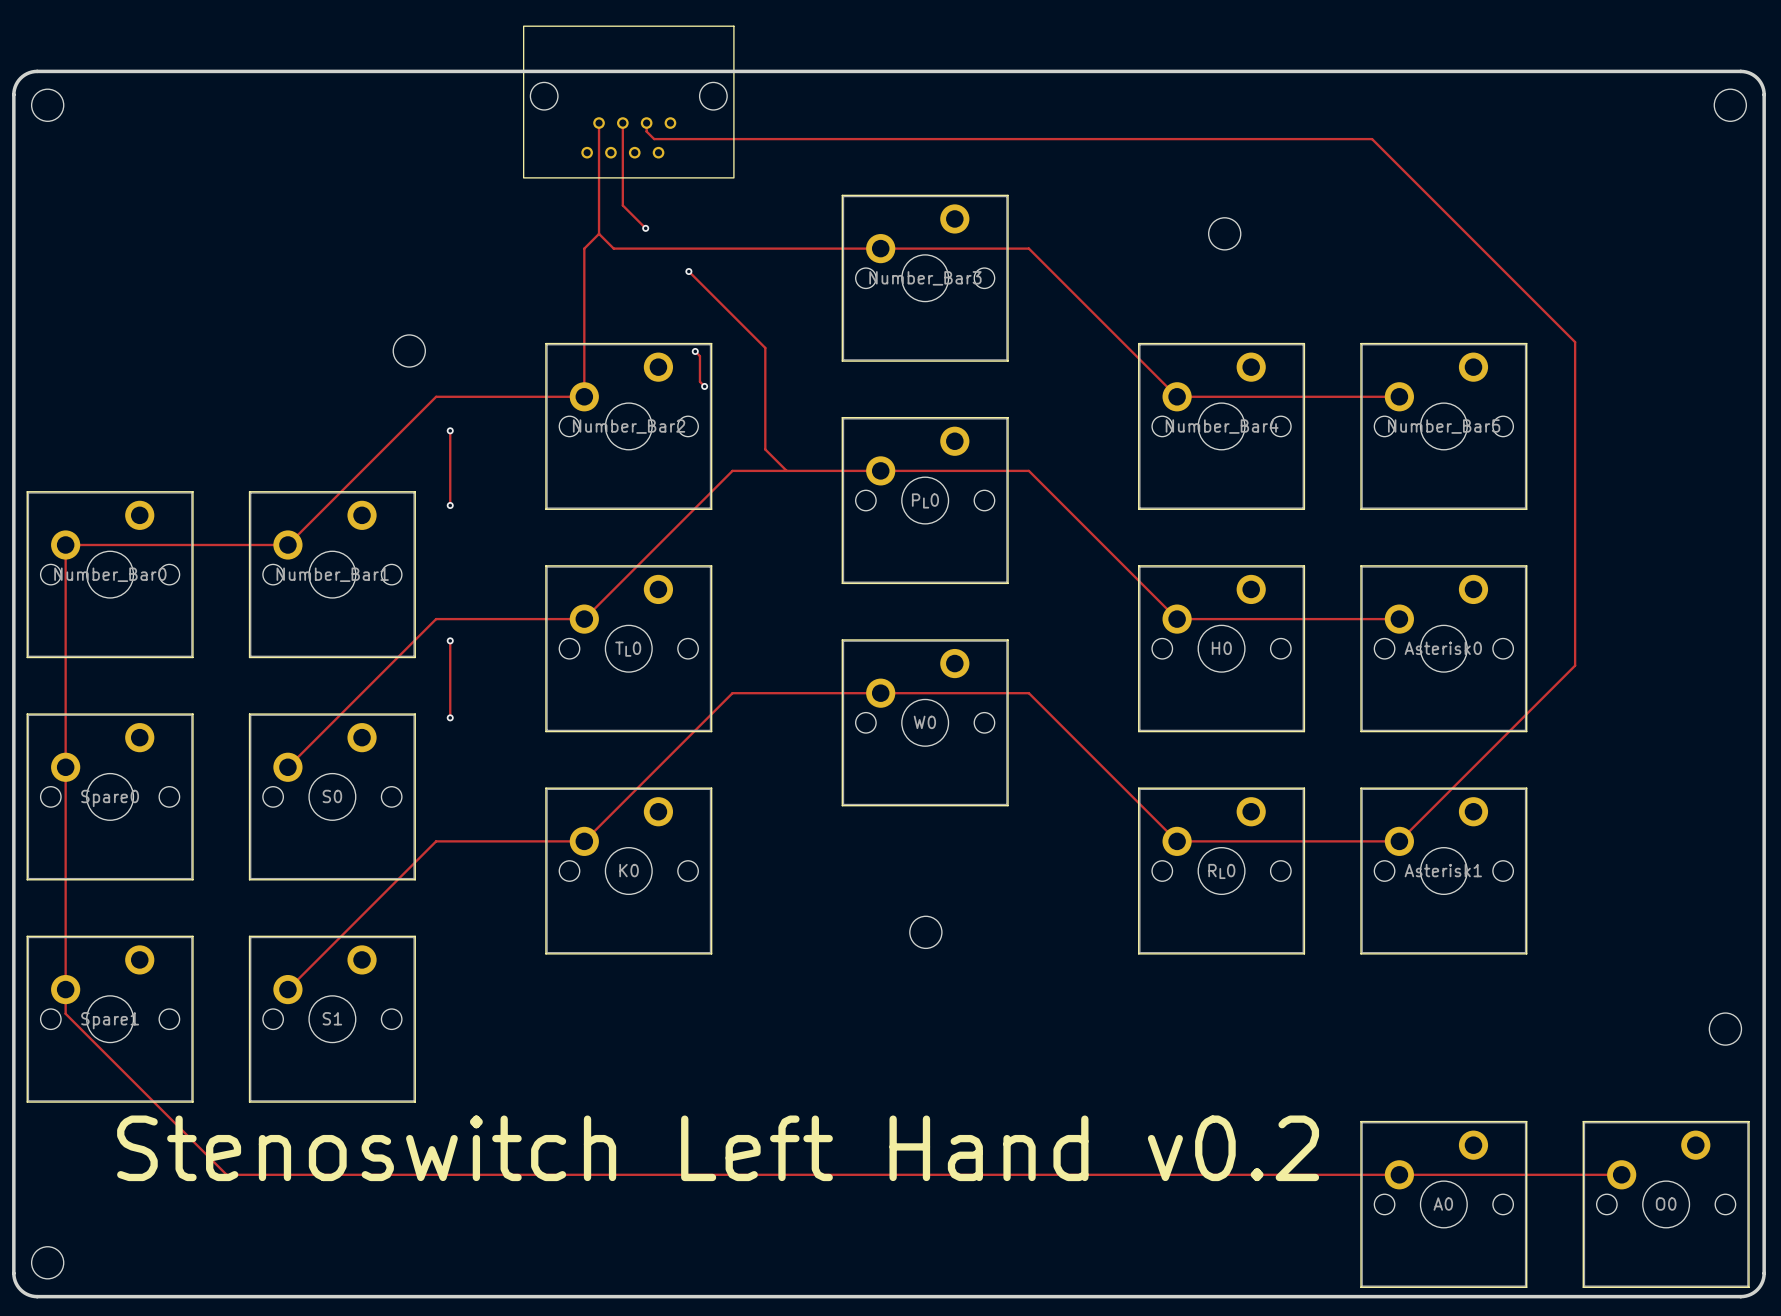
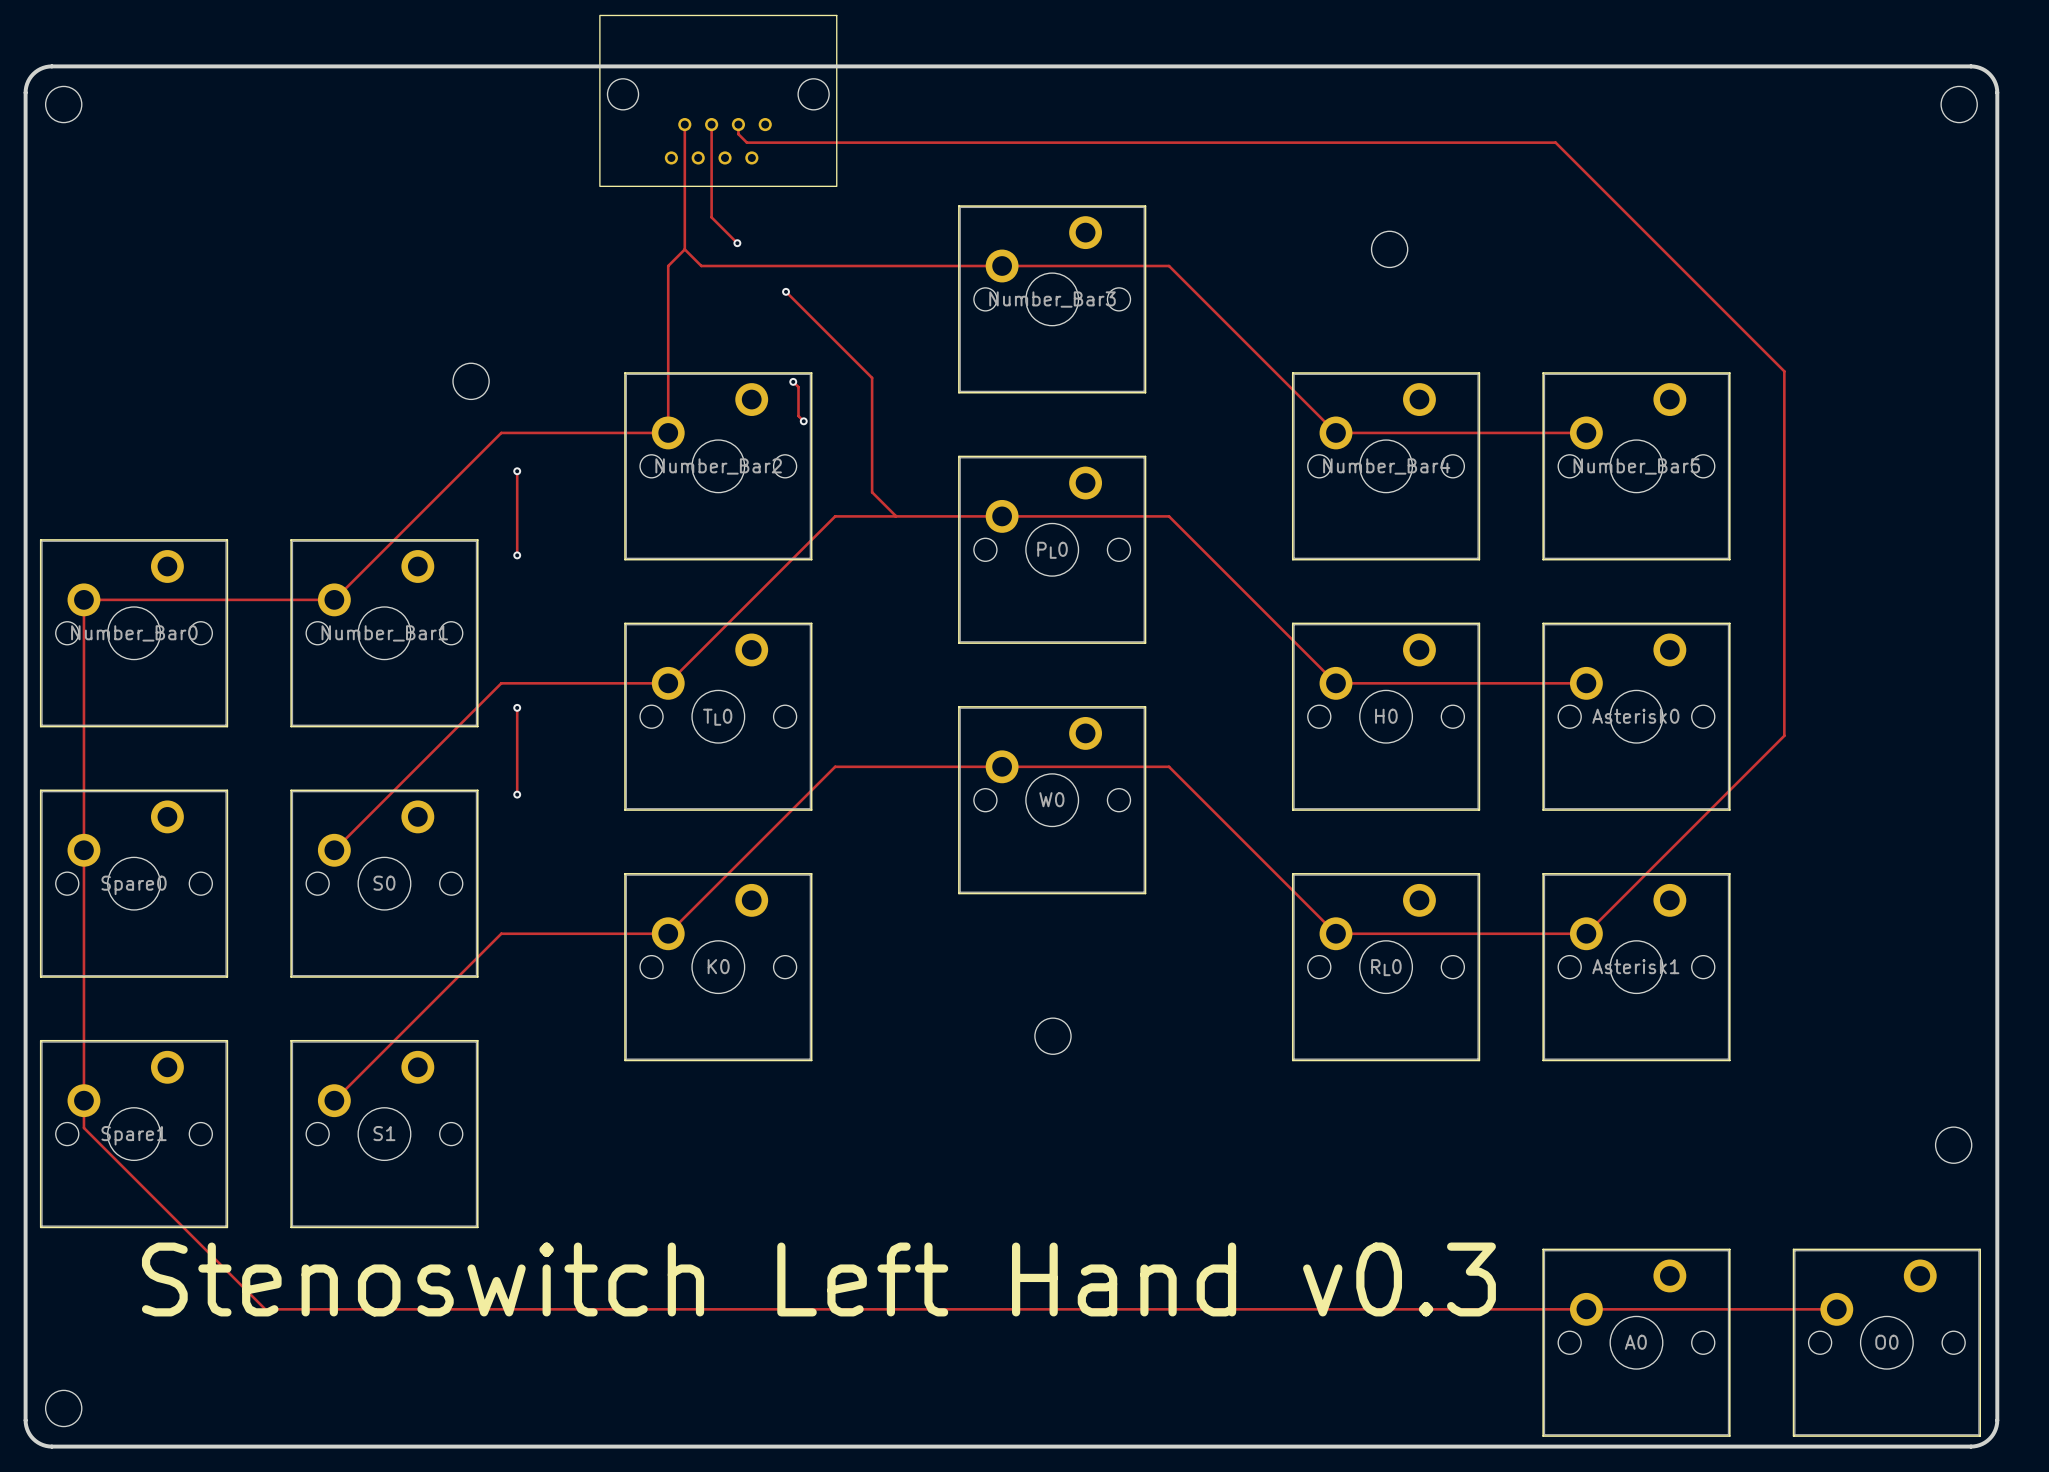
text: Stenoswitch Left Hand v0.2 (718, 1148) -> Stenoswitch Left Hand v0.3 (818, 1279)

